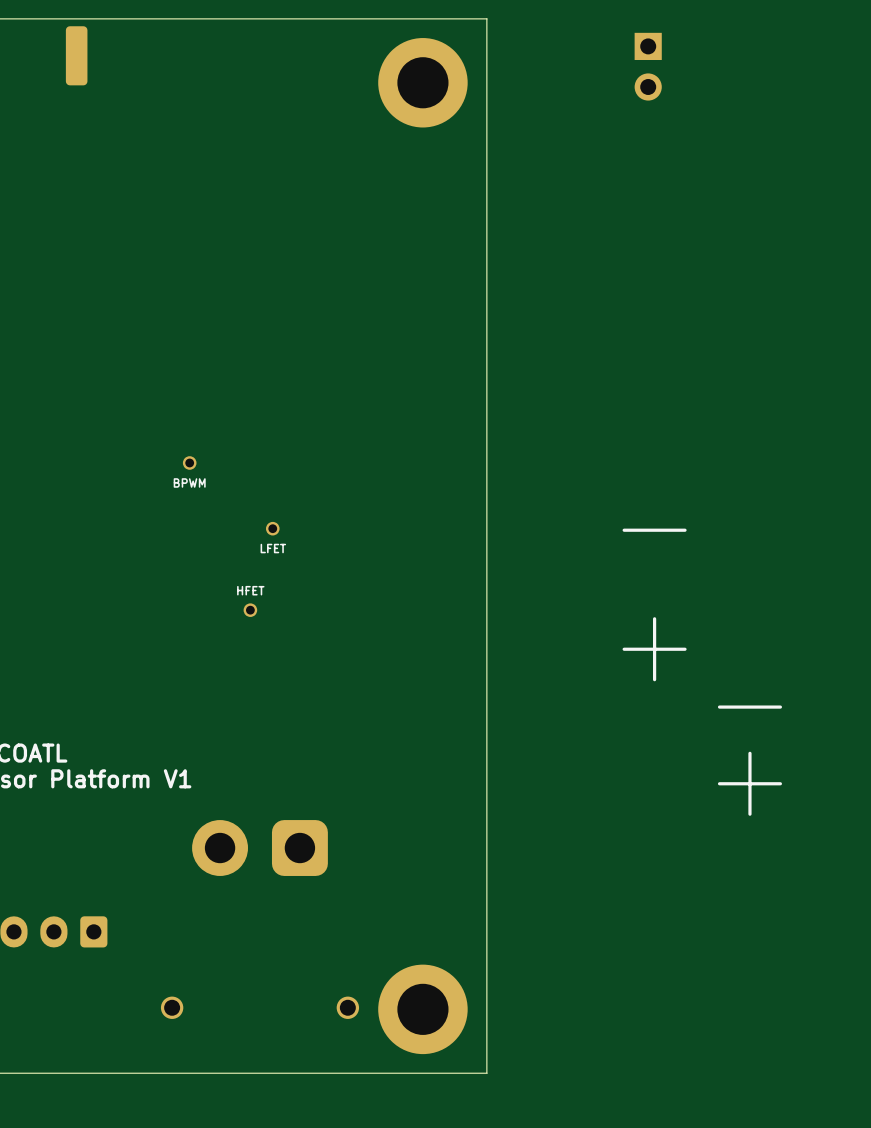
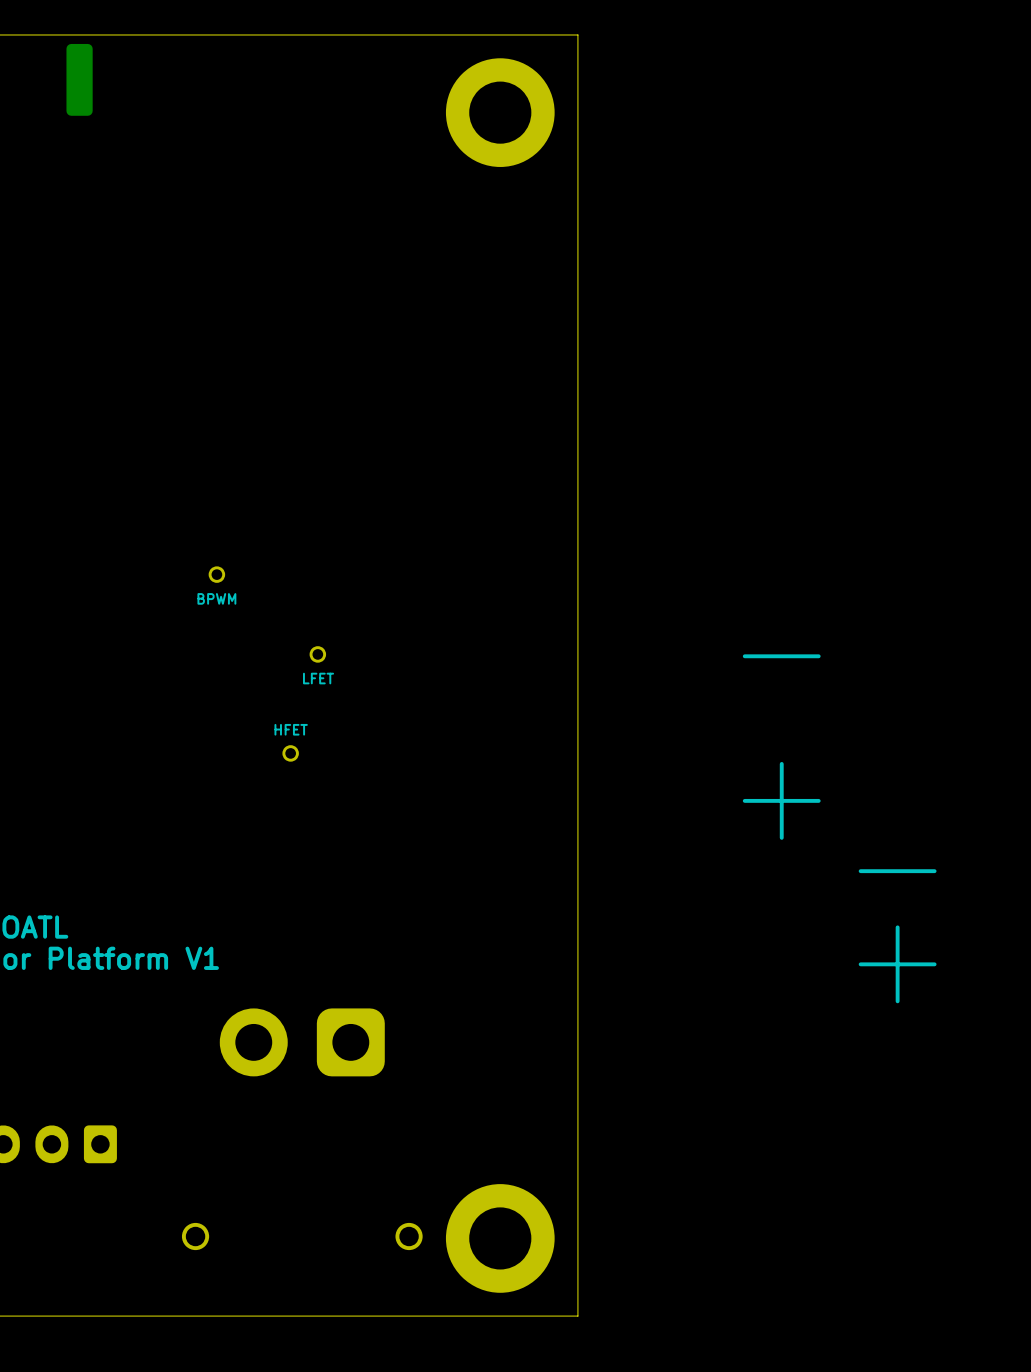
part: (648, 66) -> none

